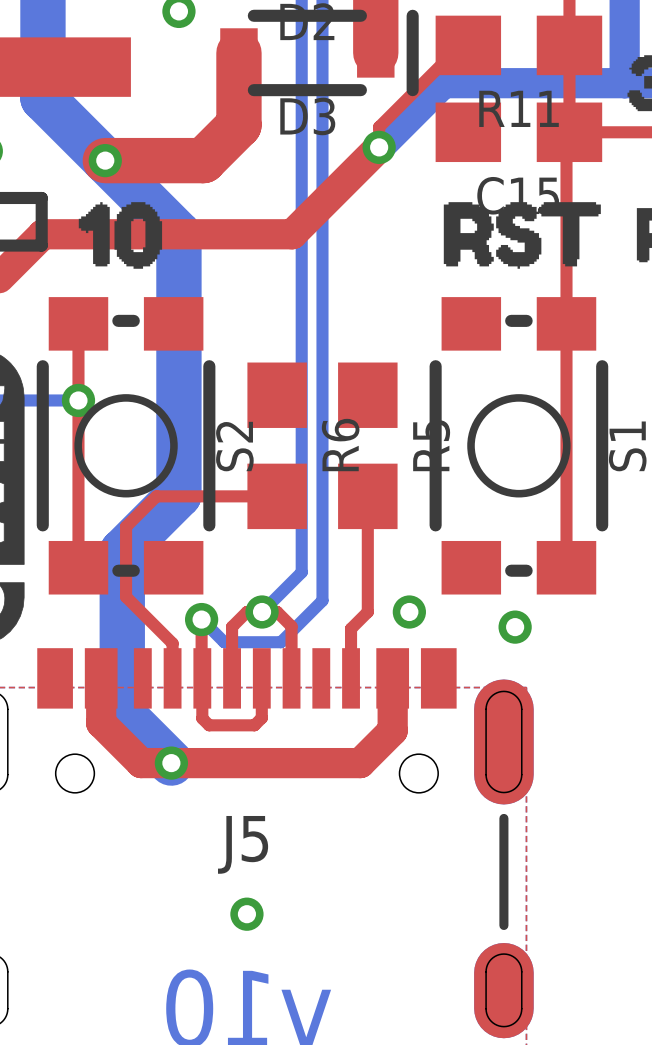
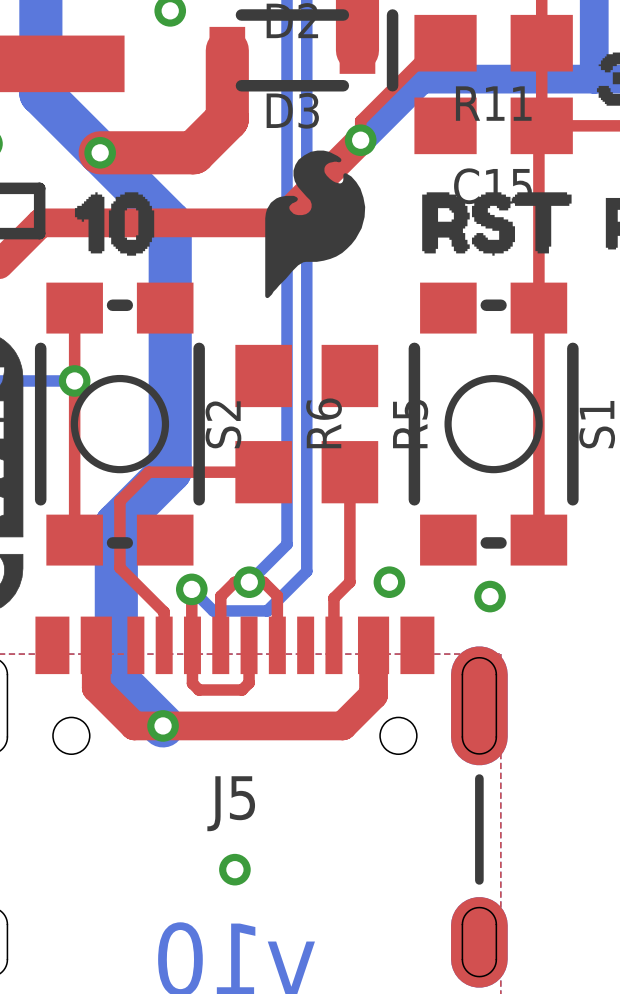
drawing: none -> [265, 150, 366, 299]

